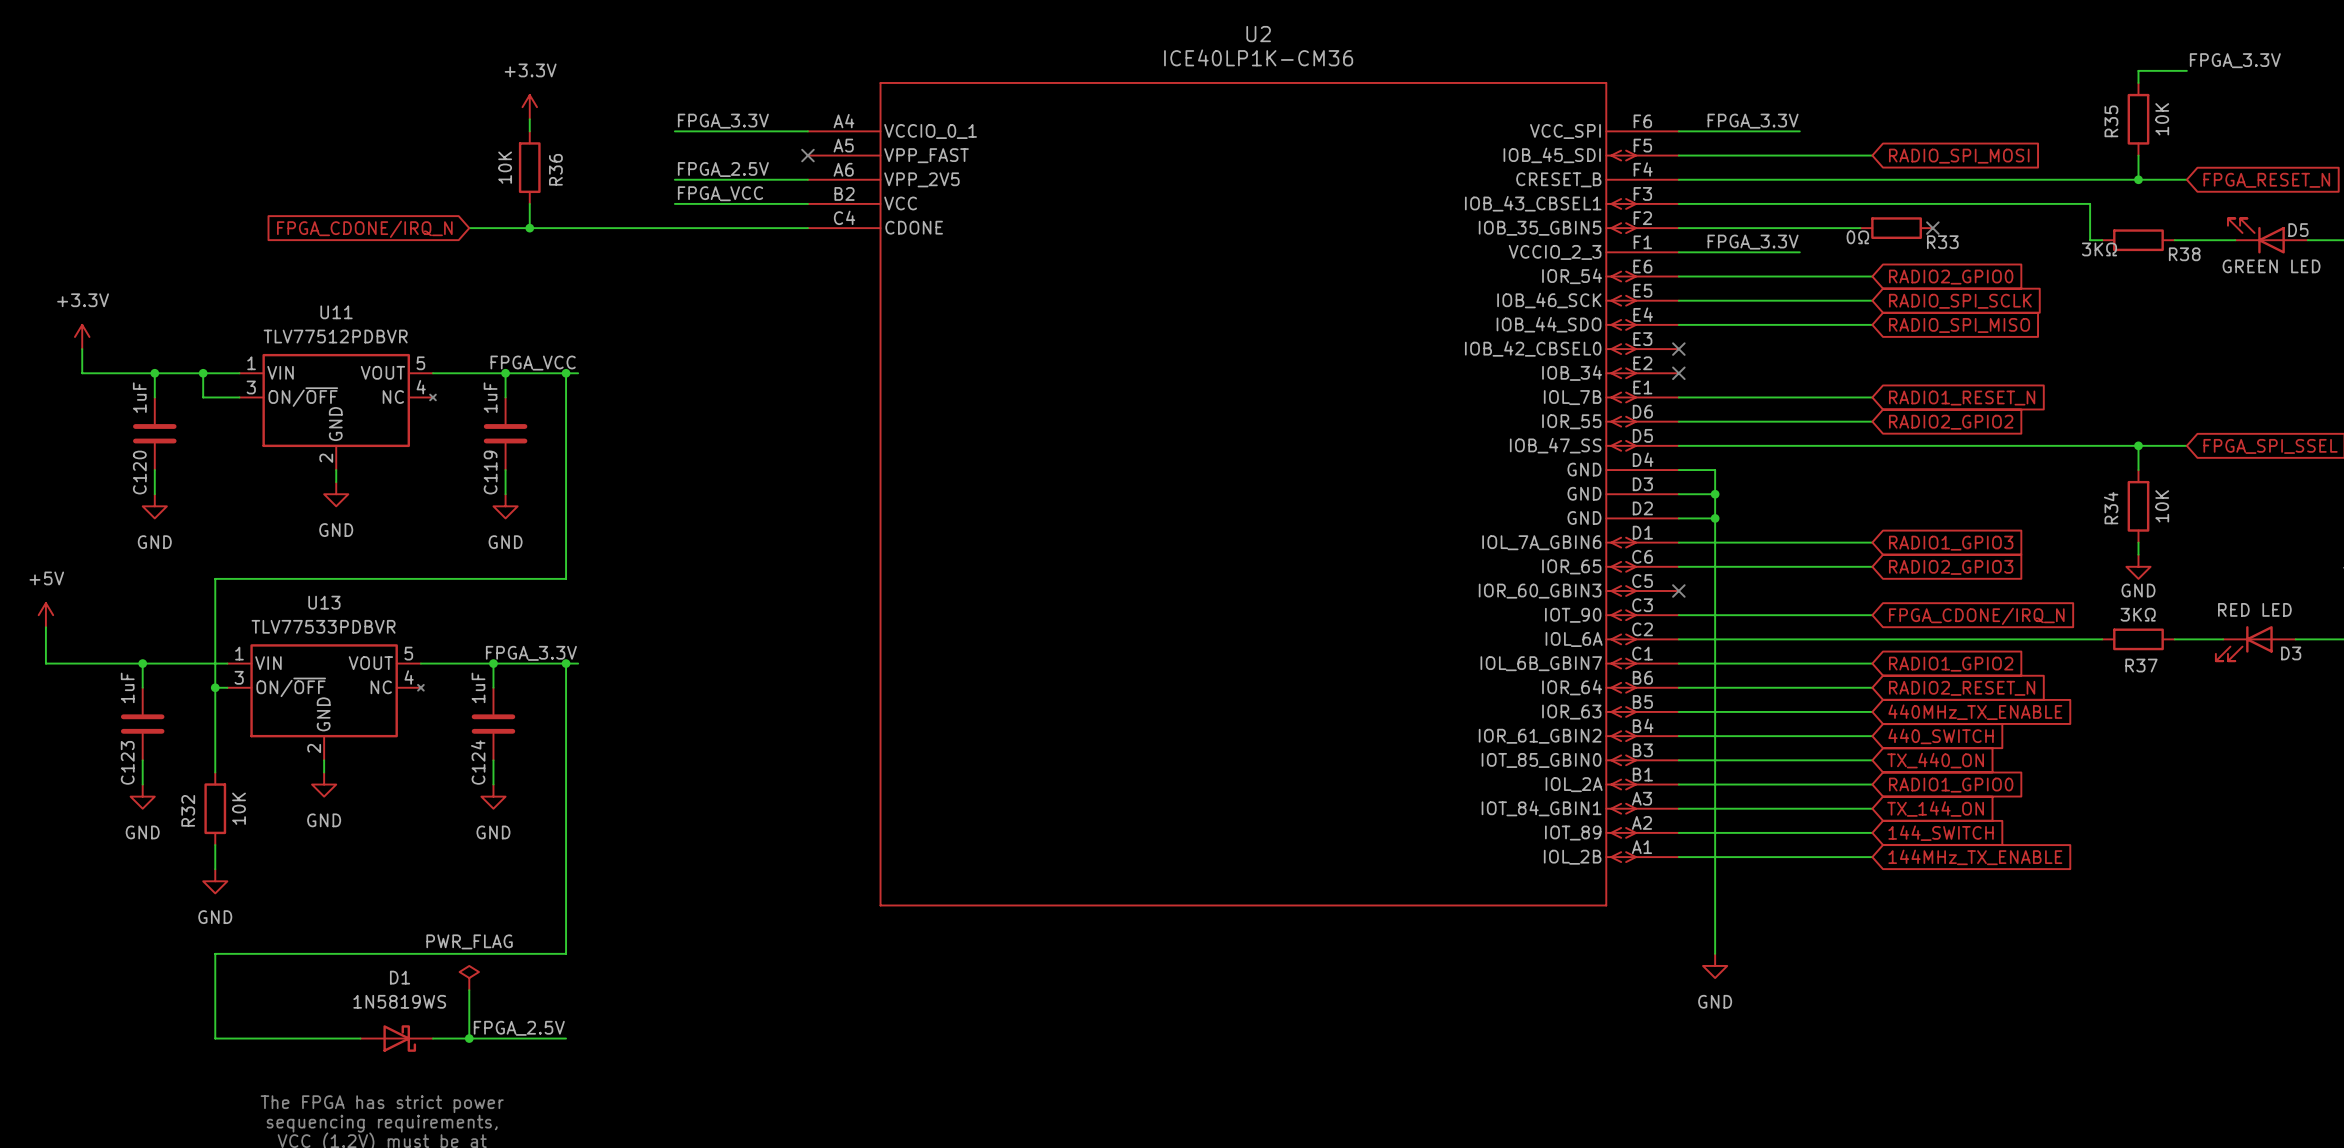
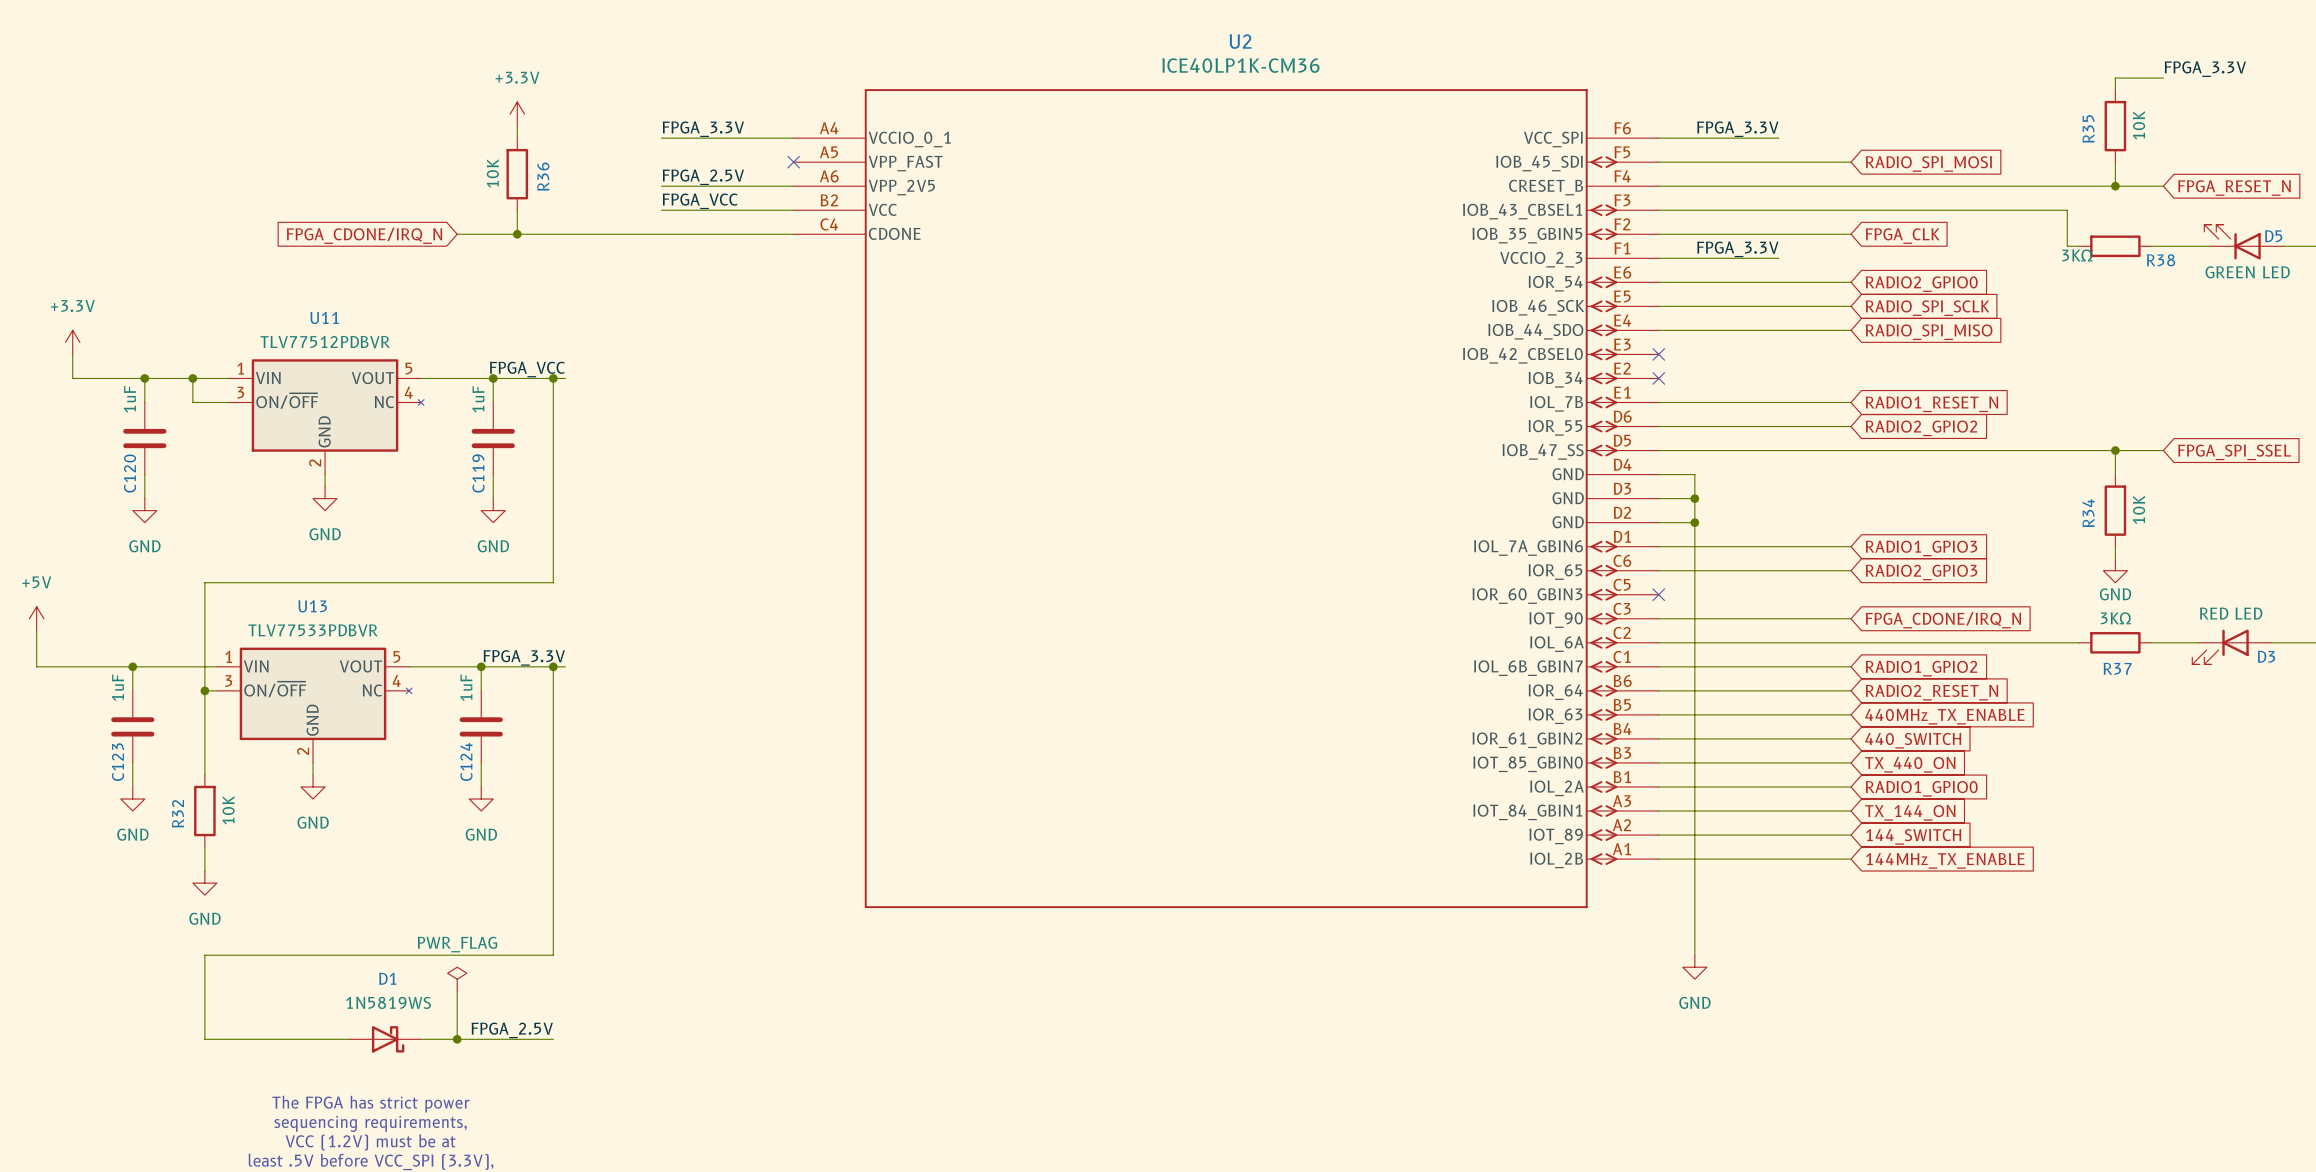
R33: 0Ω (1896, 228) -> none
global label: none -> FPGA_CLK (1902, 236)
no-connect mark: (1932, 228) -> none

